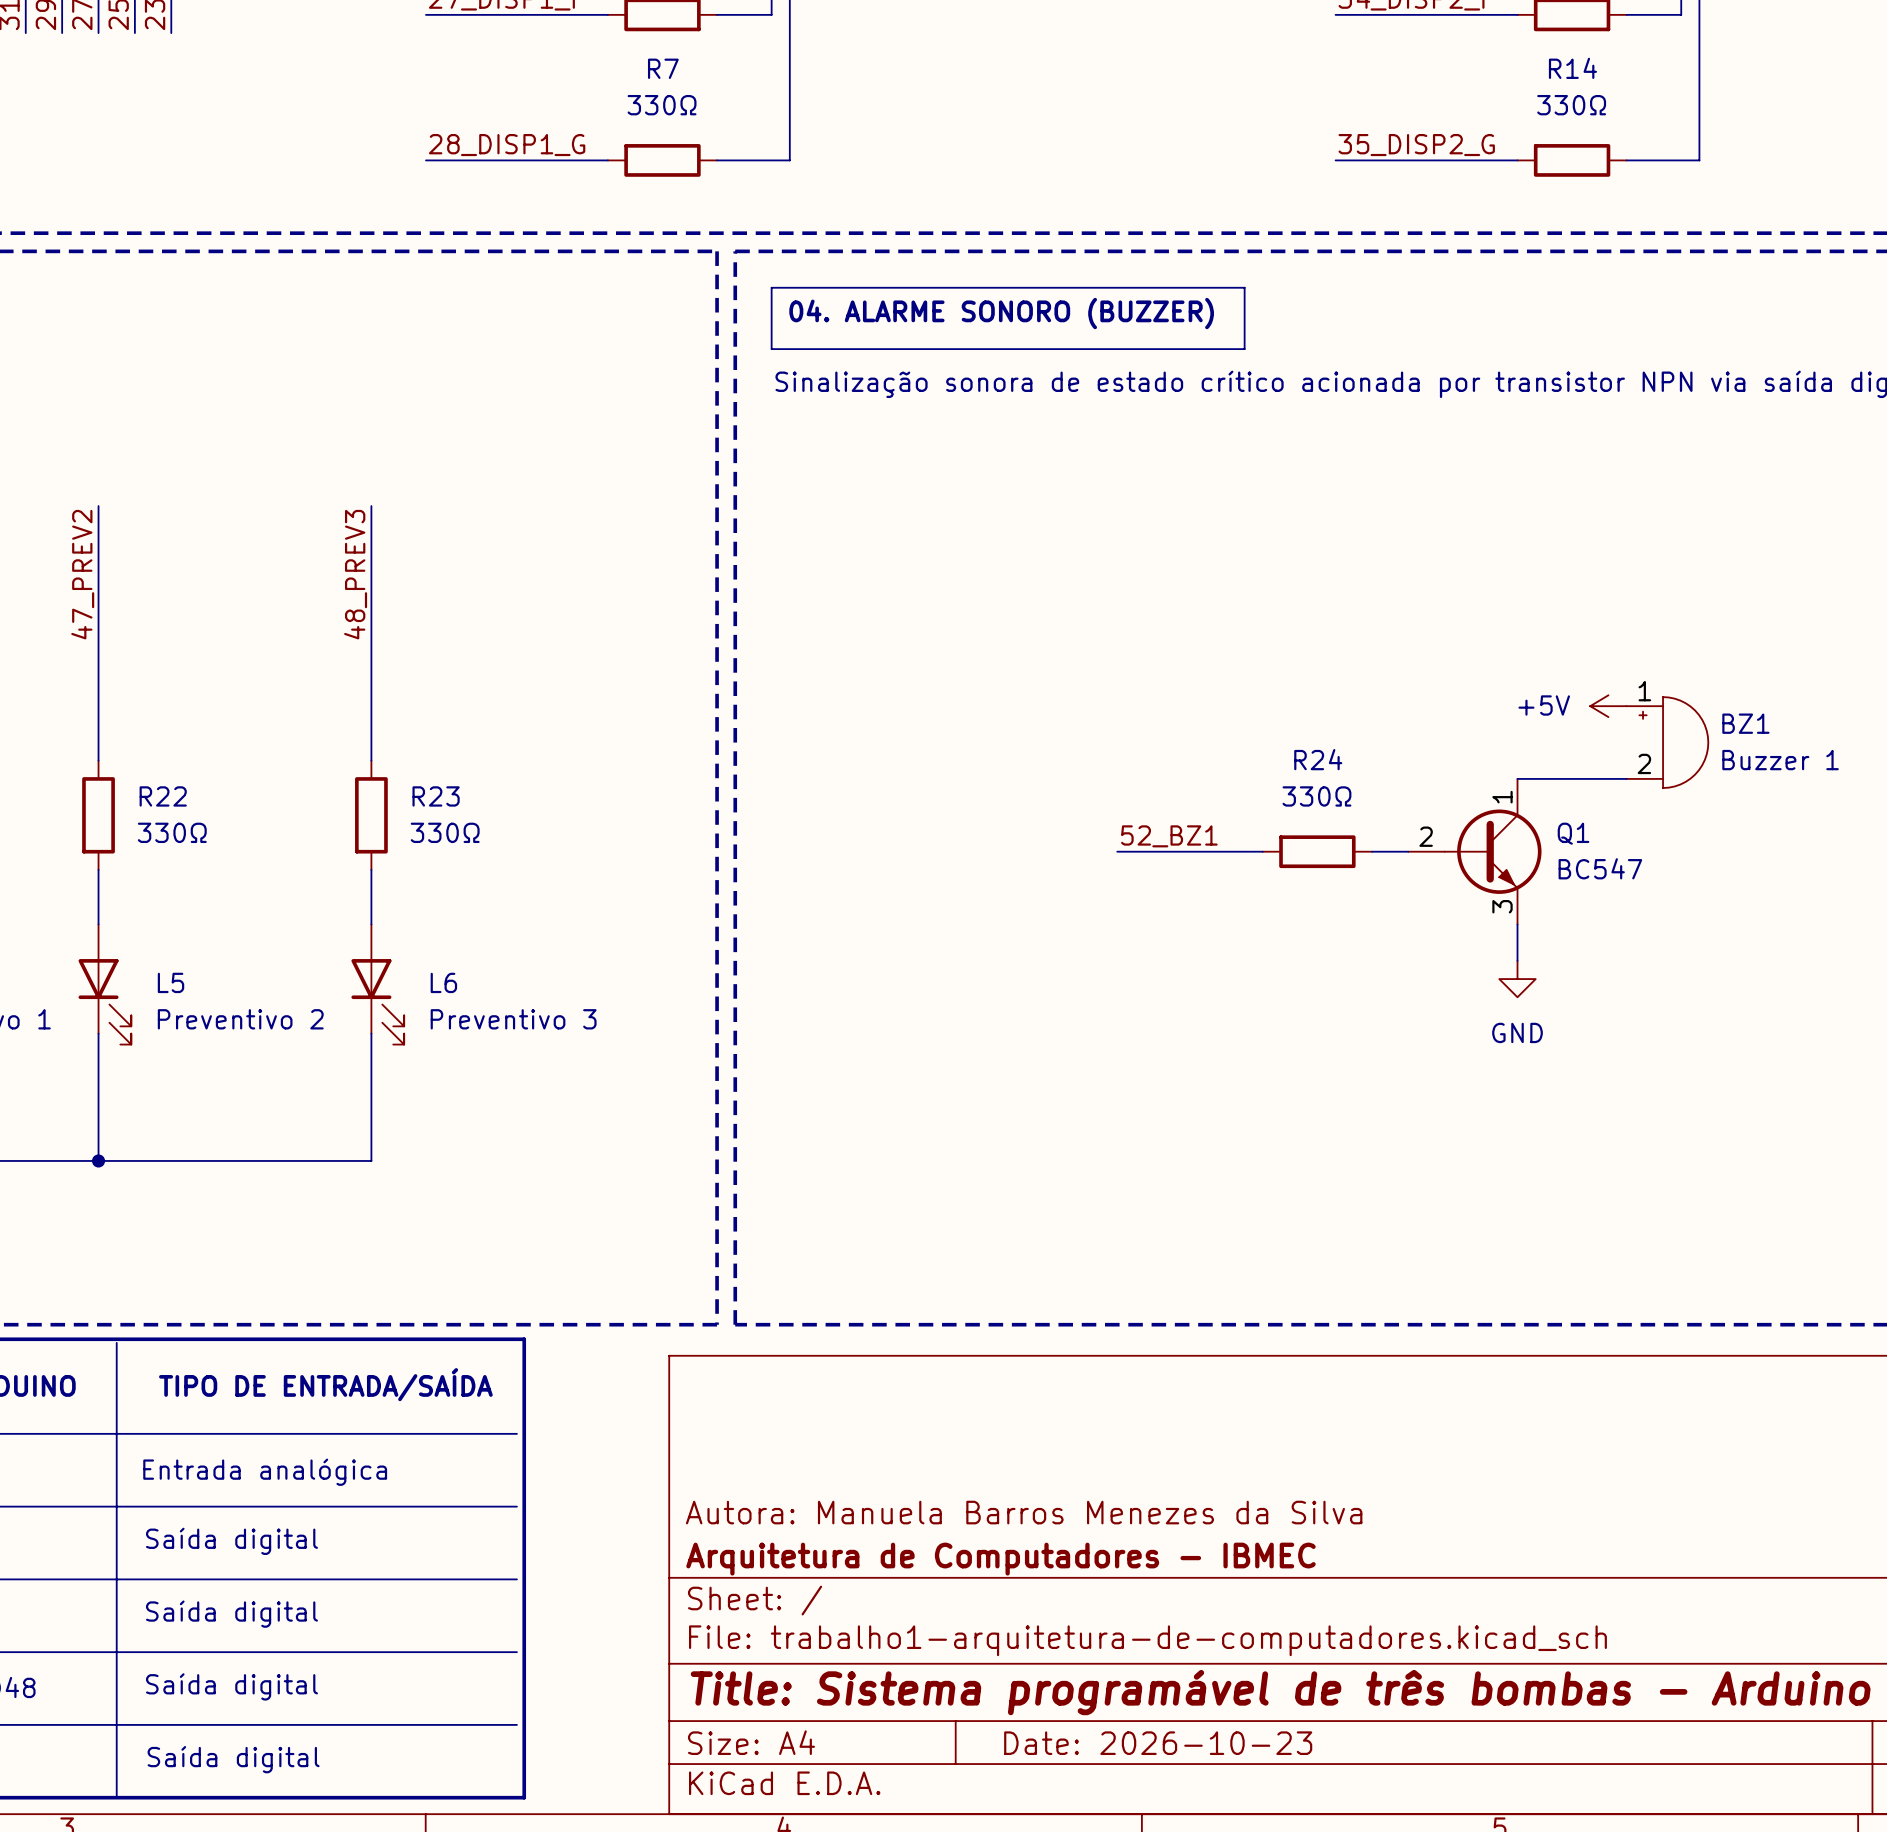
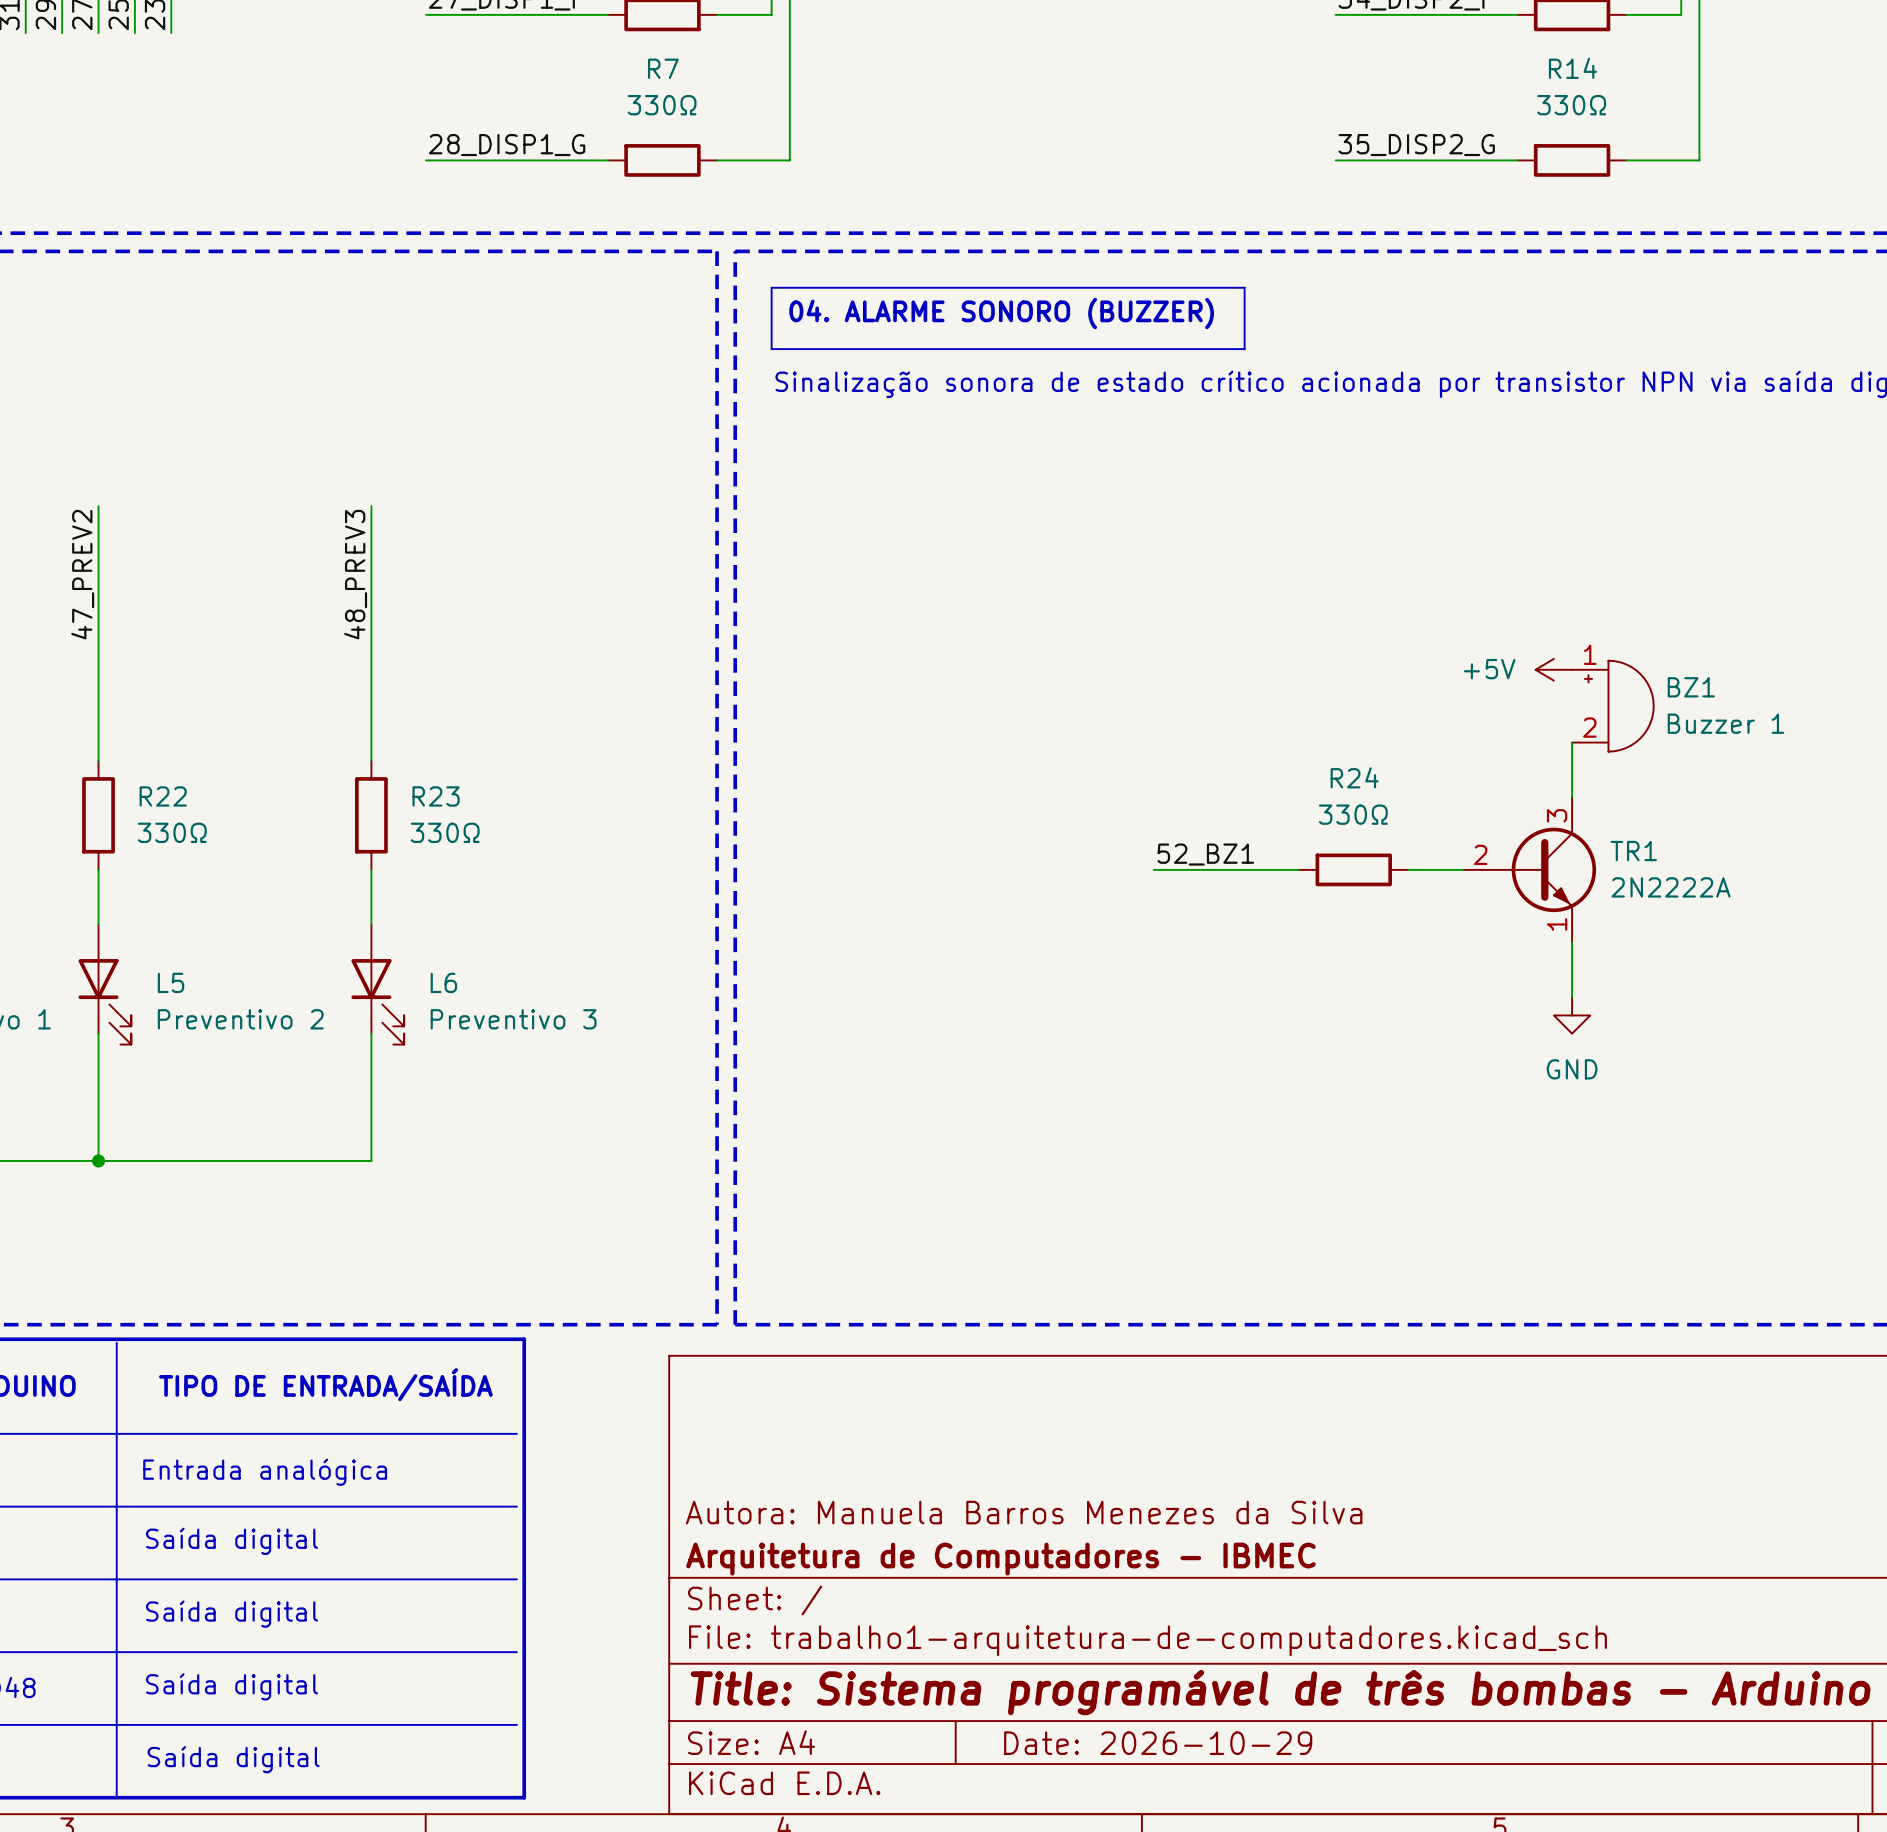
power symbol position: +5V (1608, 706) -> +5V (1553, 669)
wire: none -> (1572, 742) (1572, 797)
BZ1 position: (1667, 742) -> (1612, 706)
wire: (1517, 778) (1626, 778) -> none
label position: 52_BZ1 (1169, 836) -> 52_BZ1 (1205, 854)
wire: (1117, 851) (1262, 851) -> (1153, 869) (1299, 869)
R24 position: (1317, 851) -> (1353, 869)
wire: (1371, 851) (1408, 851) -> none
Q1: BC547 (1474, 851) -> none
wire: none -> (1408, 869) (1462, 869)
TR1: none -> 2N2222A (1529, 869)
wire: (1517, 924) (1517, 960) -> none
wire: none -> (1572, 942) (1572, 997)
power symbol position: GND (1517, 979) -> GND (1572, 1015)
title block: Date: 2026-10-23 (1158, 1743) -> Date: 2026-10-29 (1158, 1743)

